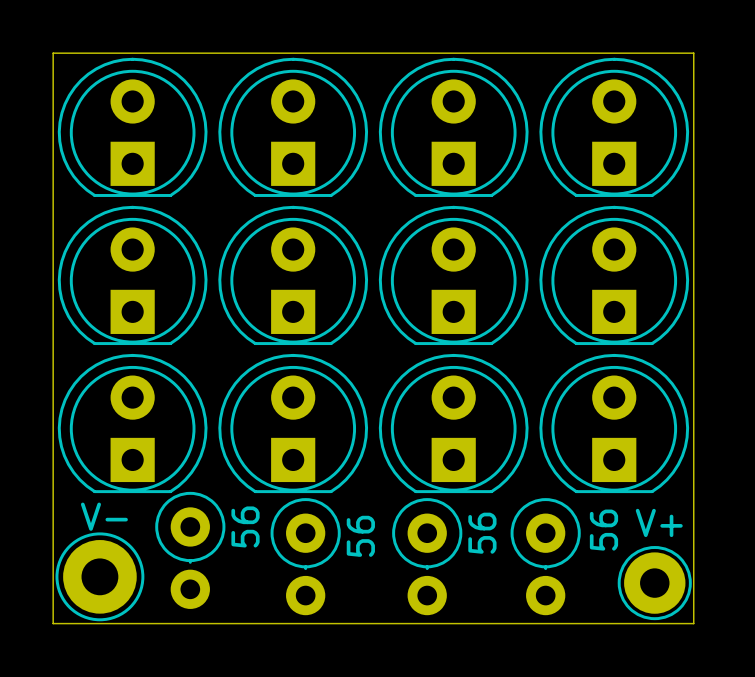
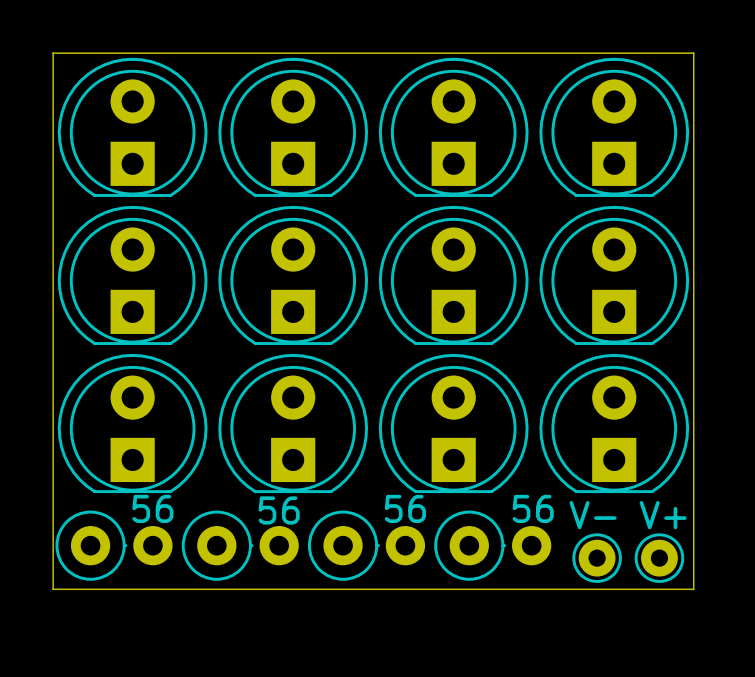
text: none -> V- V+ (628, 515)
text: V- (104, 516) -> none
text: V+ (659, 522) -> none
part: none -> 56 (114, 545)
part: none -> 56 (240, 545)
part: none -> 56 (366, 545)
part: none -> 56 (492, 545)
part: 56 (190, 550) -> none
part: 56 (305, 556) -> none
part: 56 (427, 556) -> none
part: 56 (545, 556) -> none
part: none -> (597, 558)
part: none -> (659, 558)
part: (99, 576) -> none
part: (654, 583) -> none
board edge: (53, 589) (53, 623) (693, 623) (693, 589) -> (53, 589) (693, 589)

